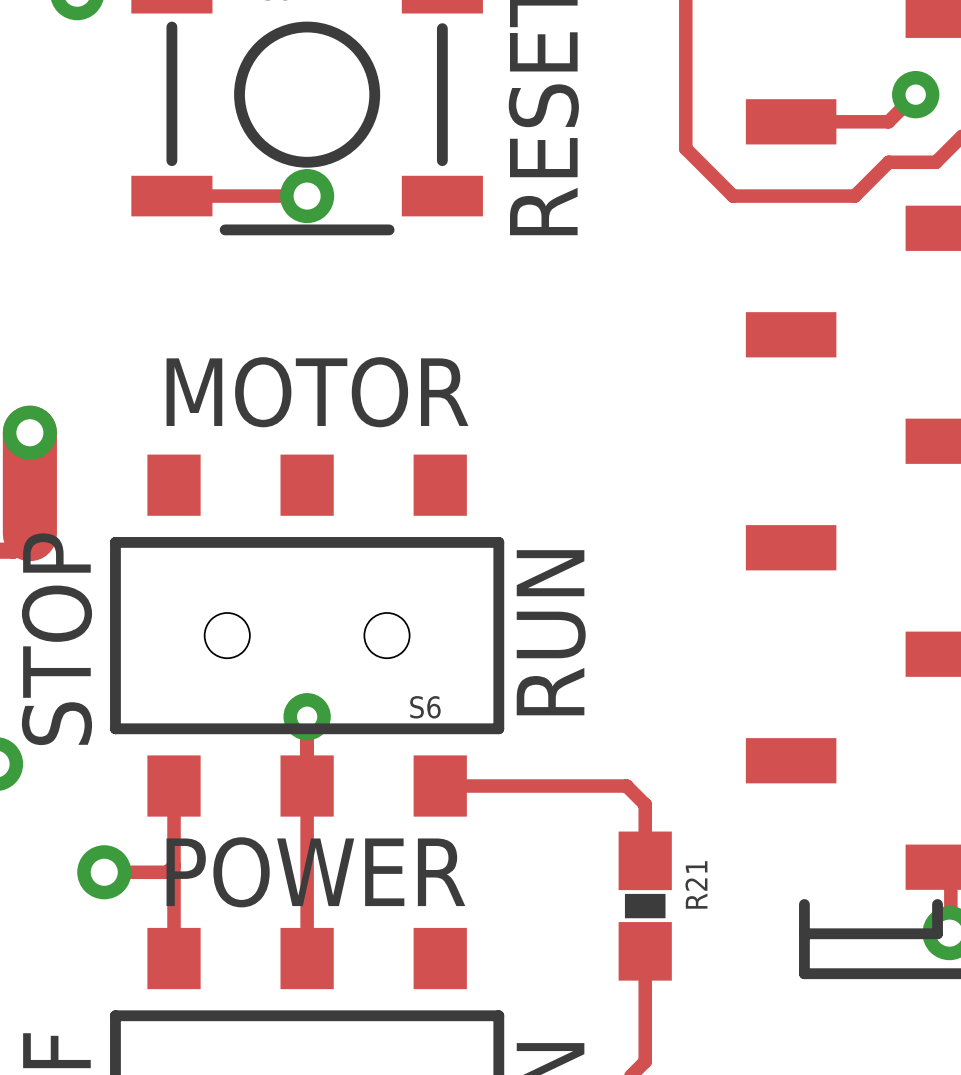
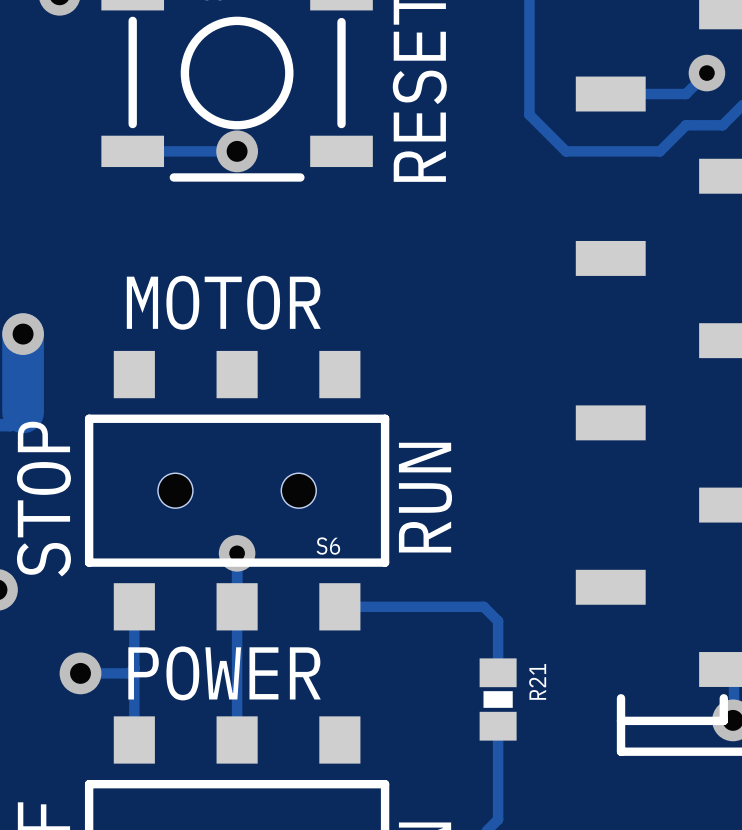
R21 footprint: [618, 831, 672, 981] -> [479, 658, 517, 741]

